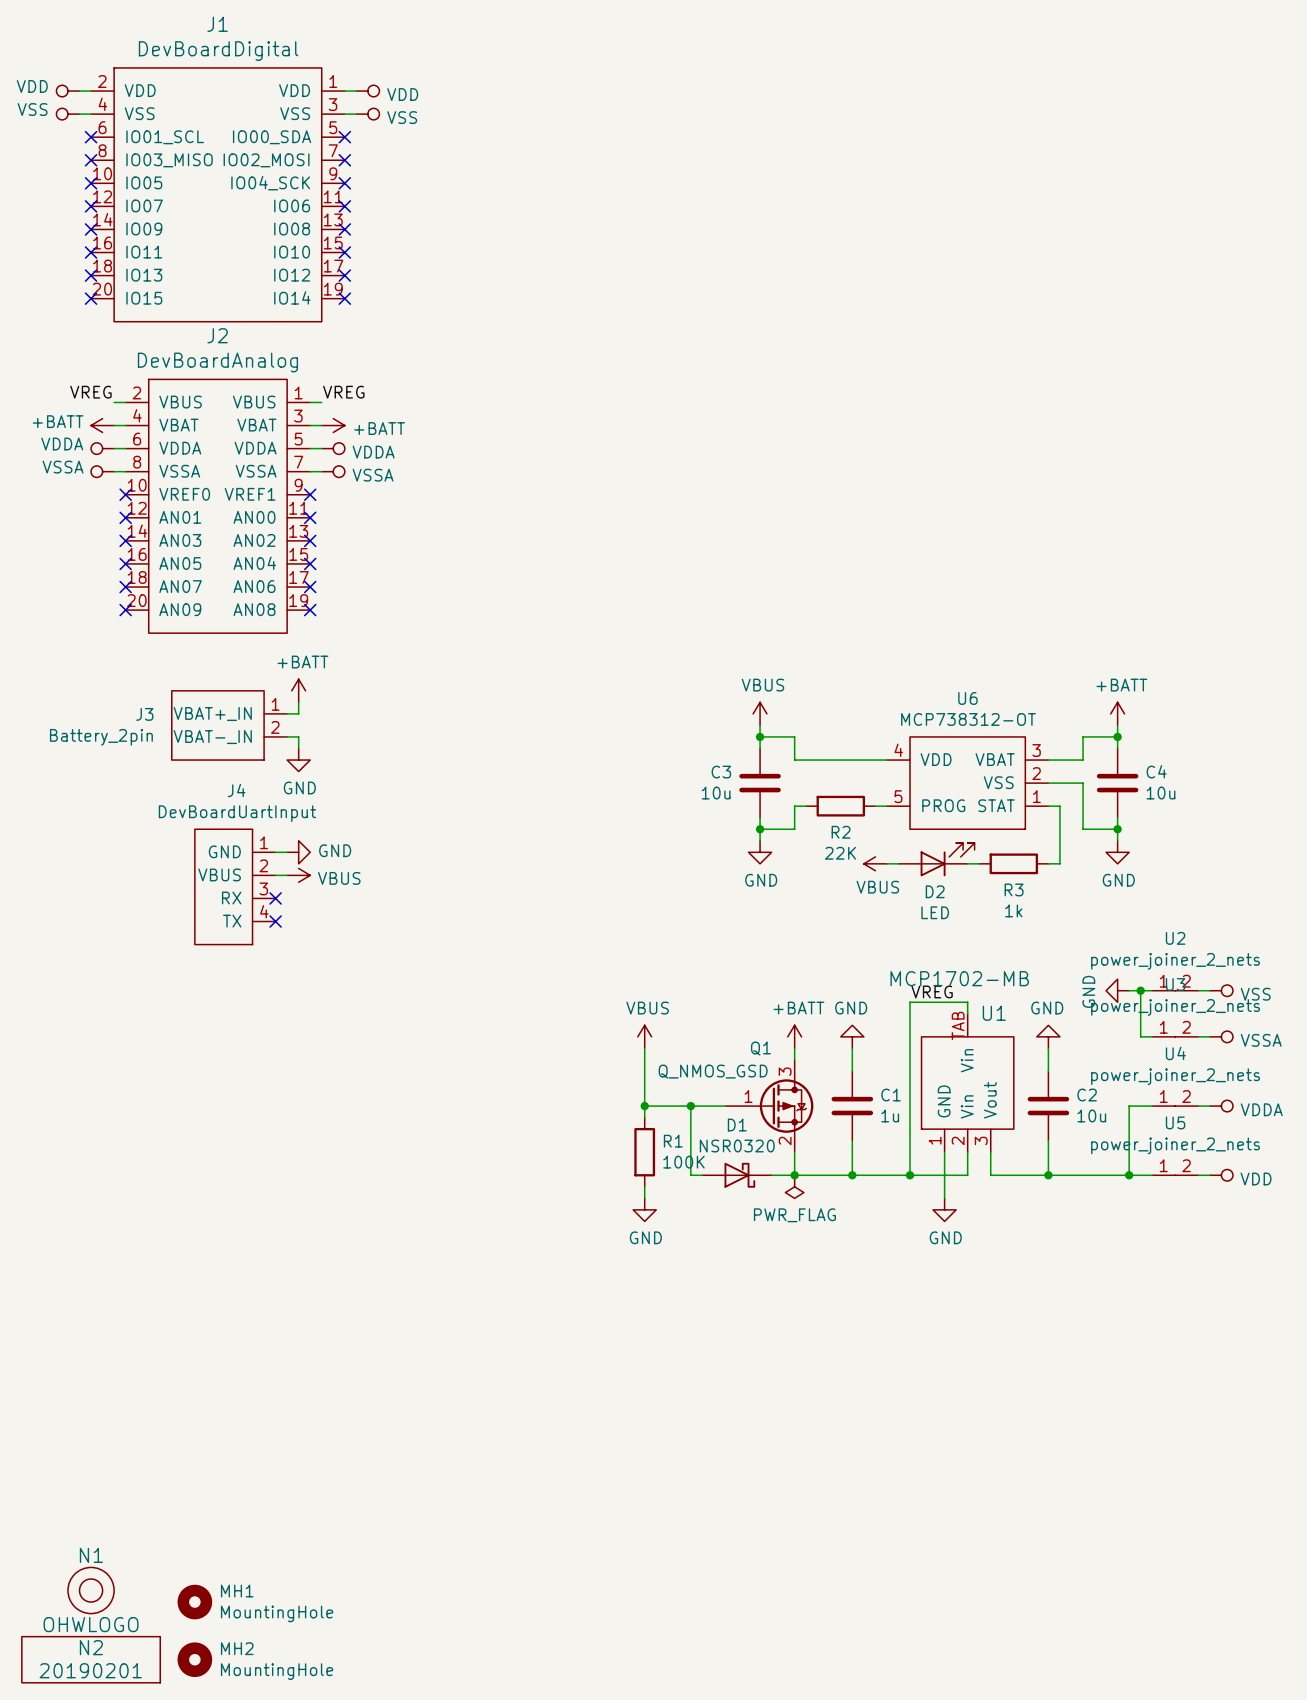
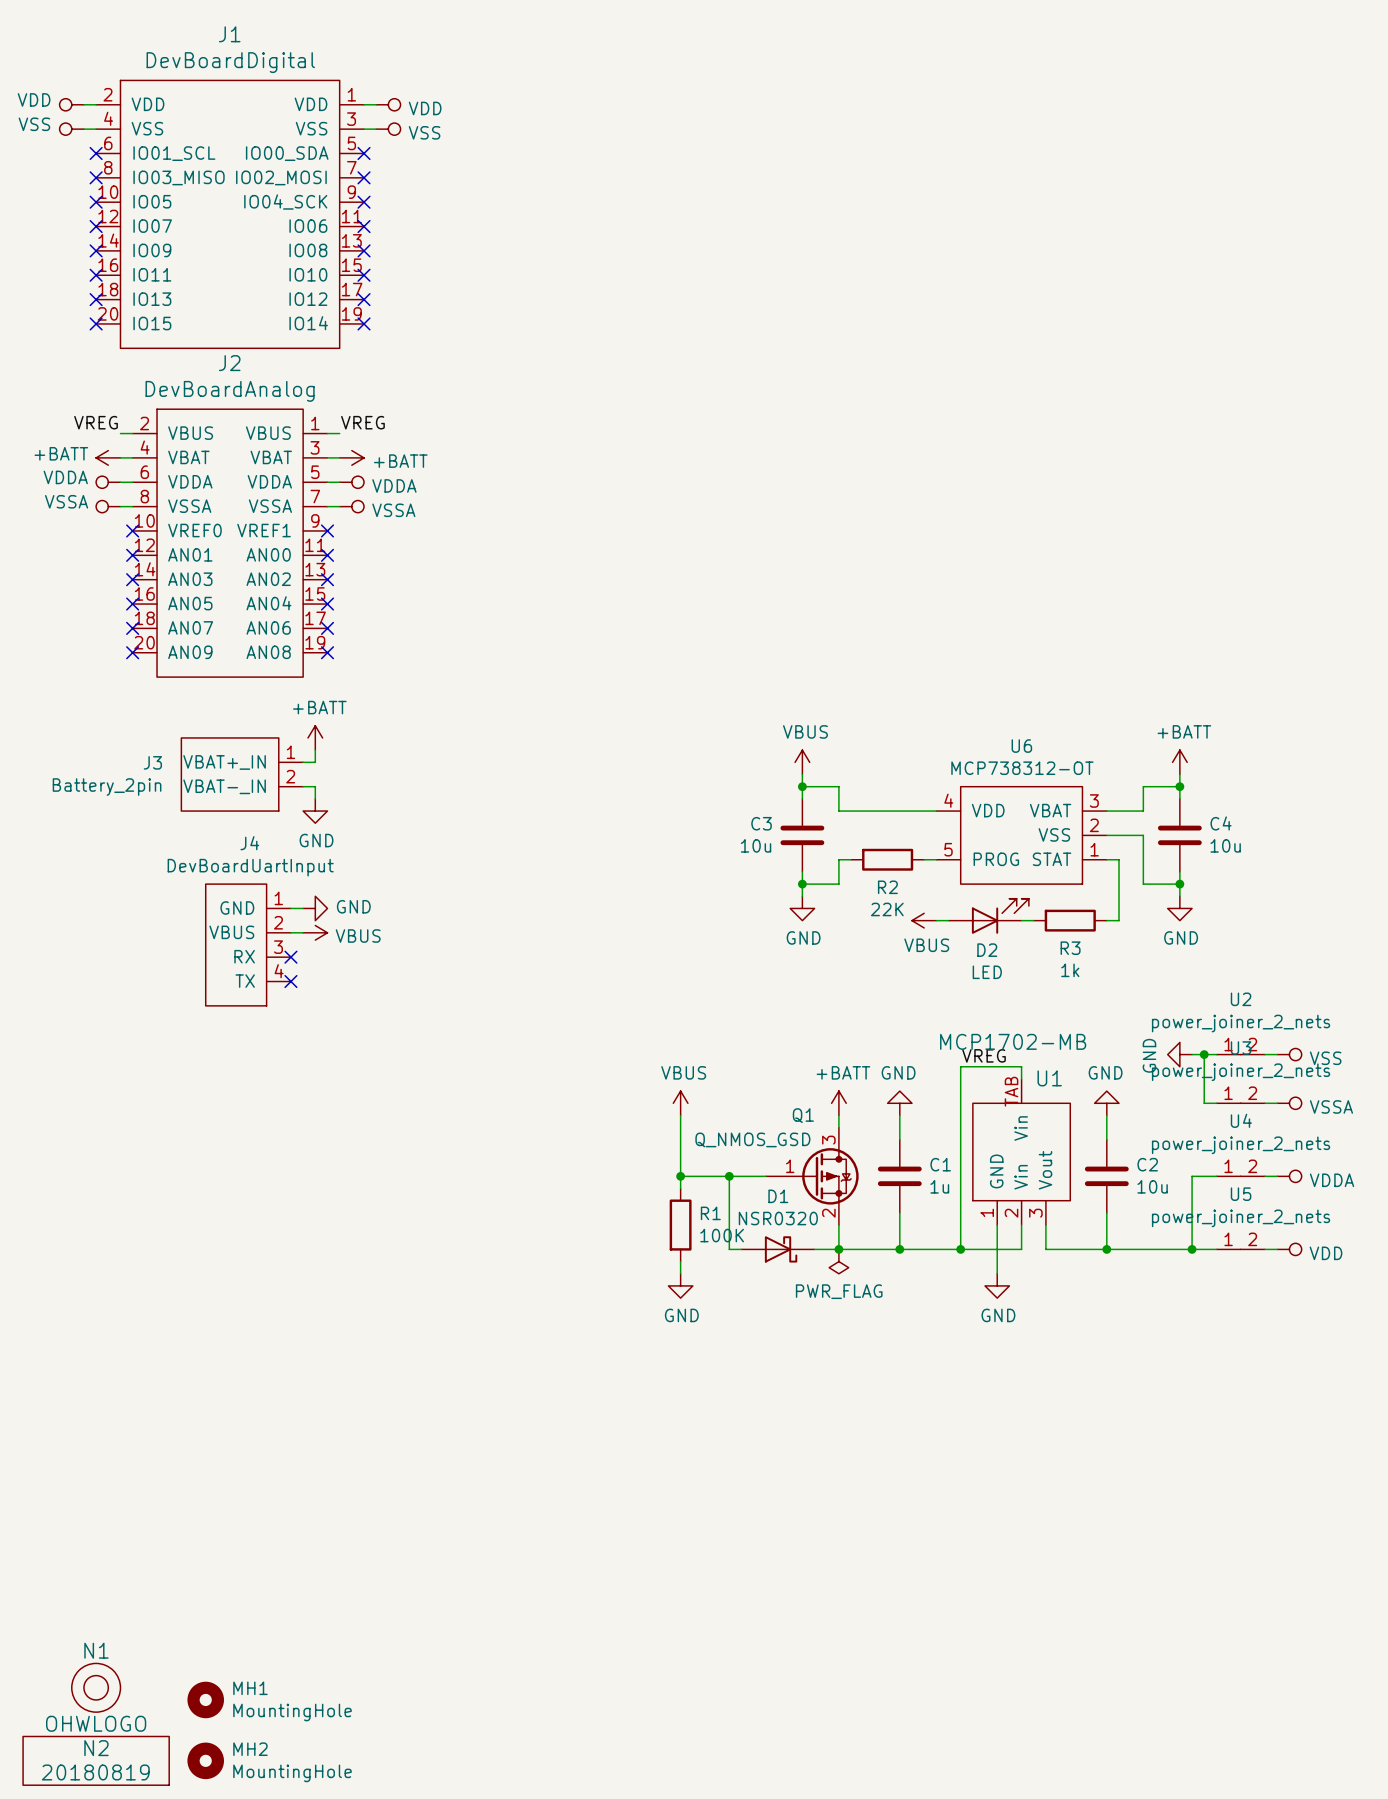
N2 value: 20190201 (90, 1670) -> 20180819 (95, 1772)

